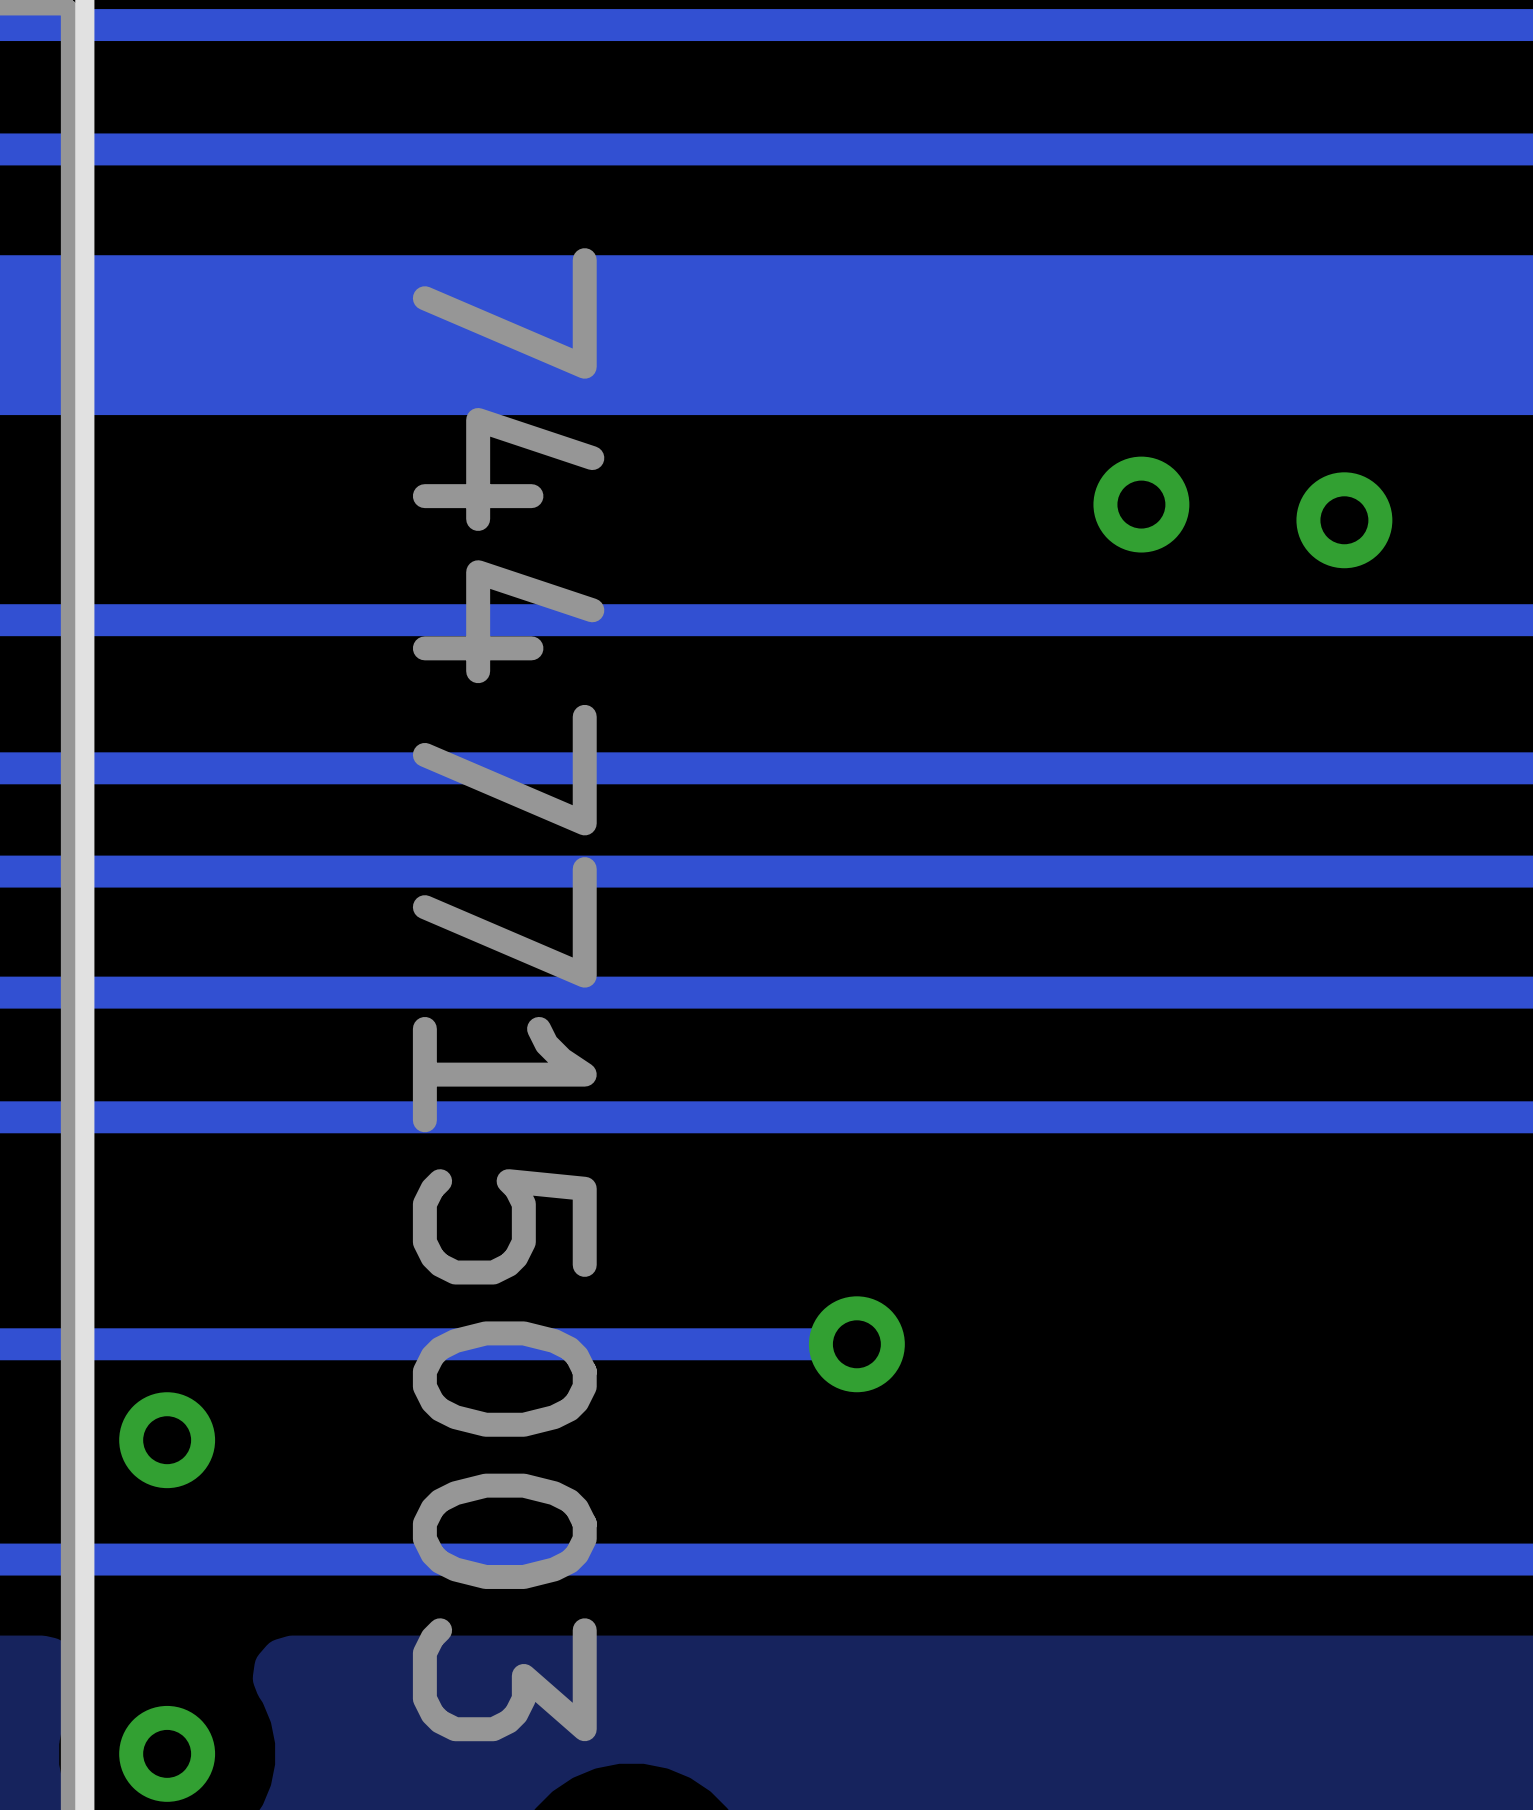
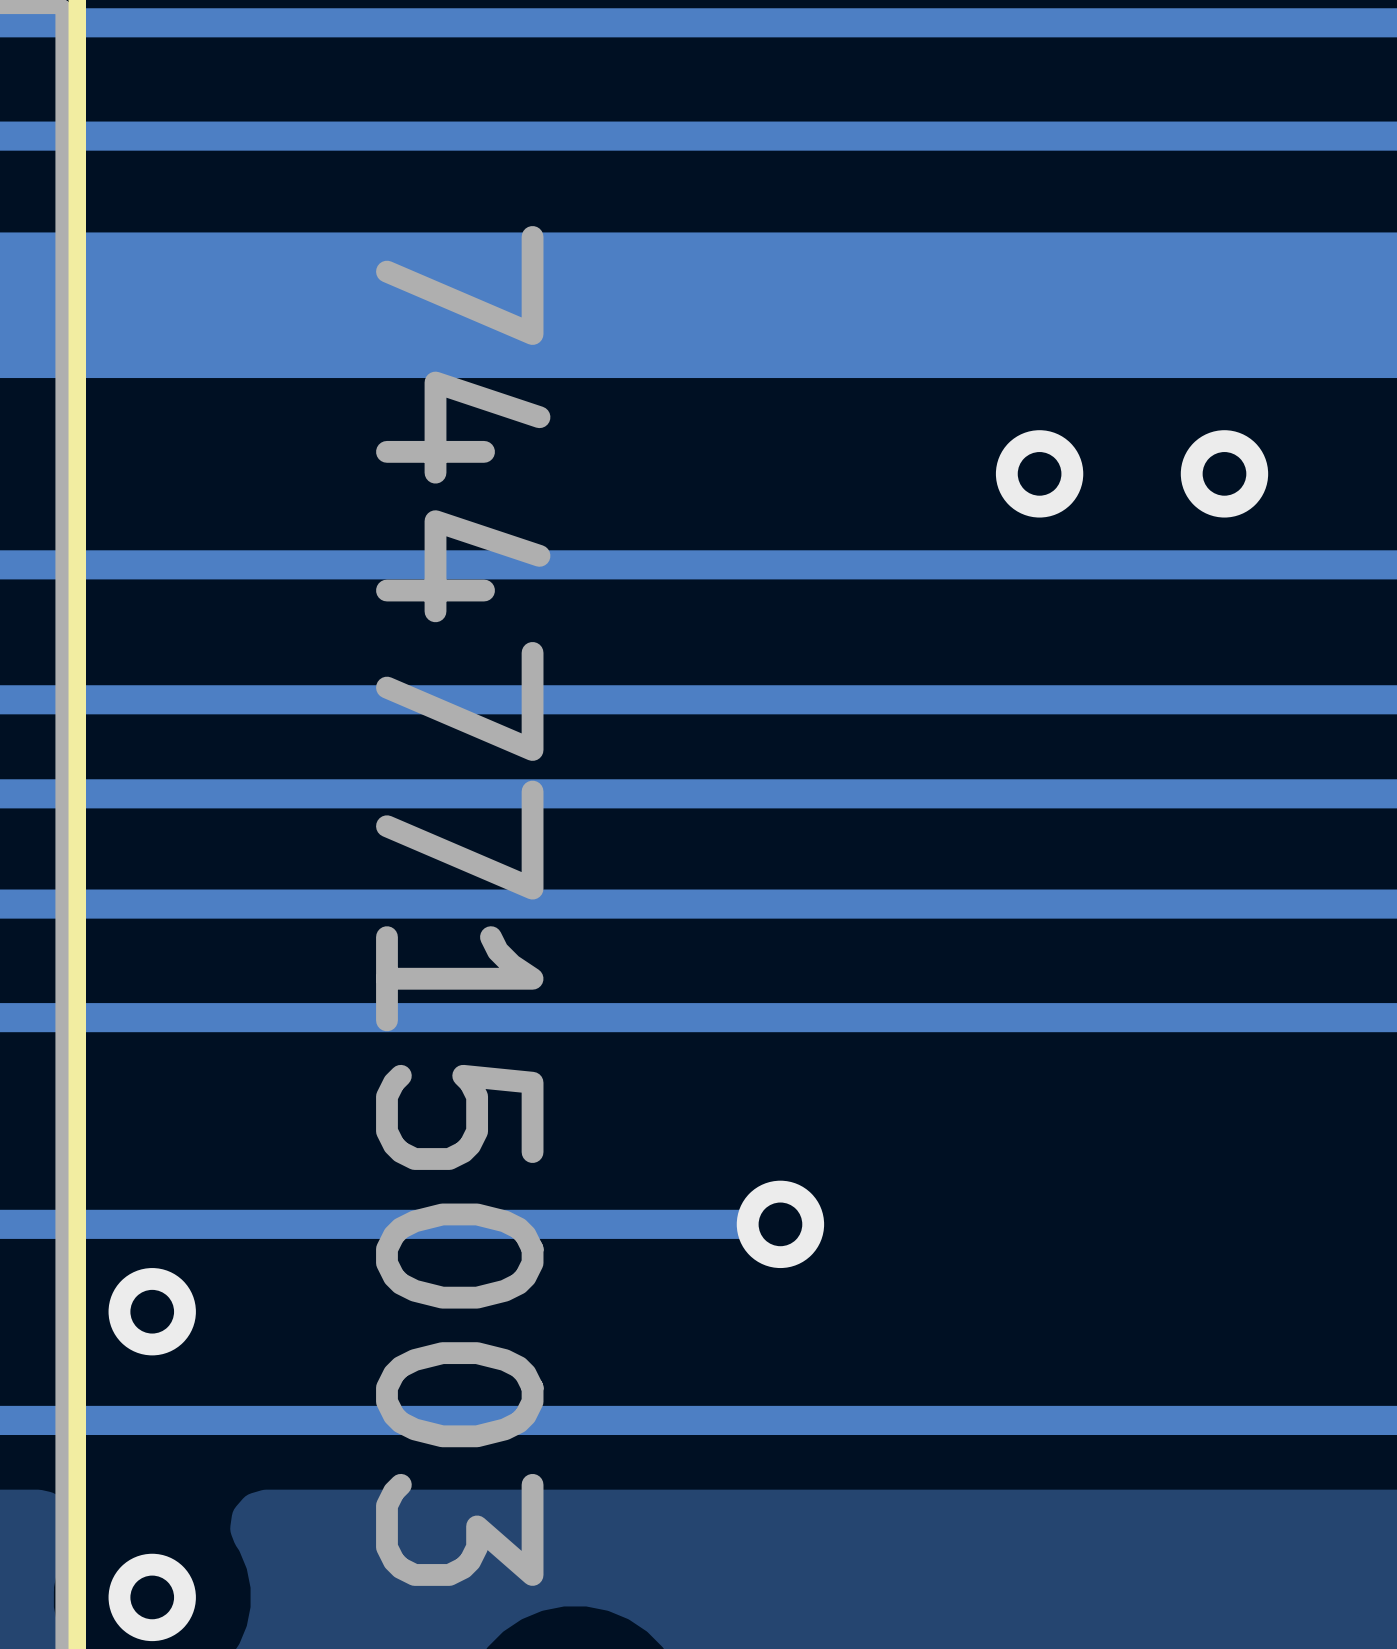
via position: (1141, 504) -> (1039, 473)

